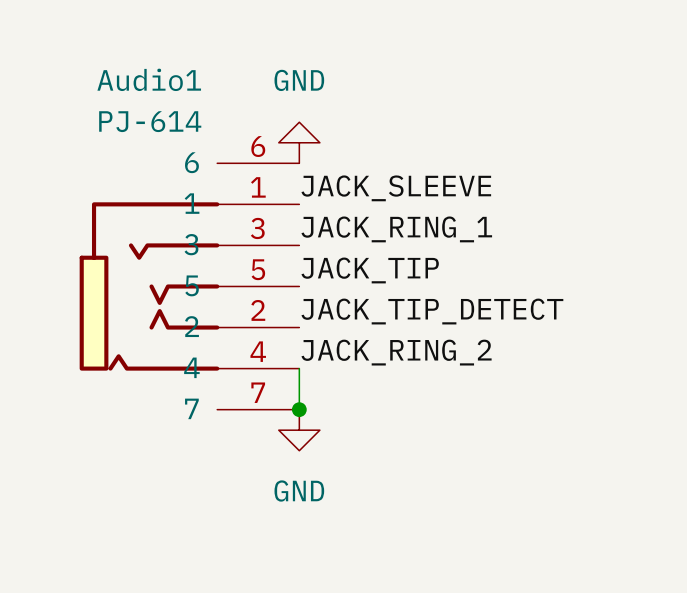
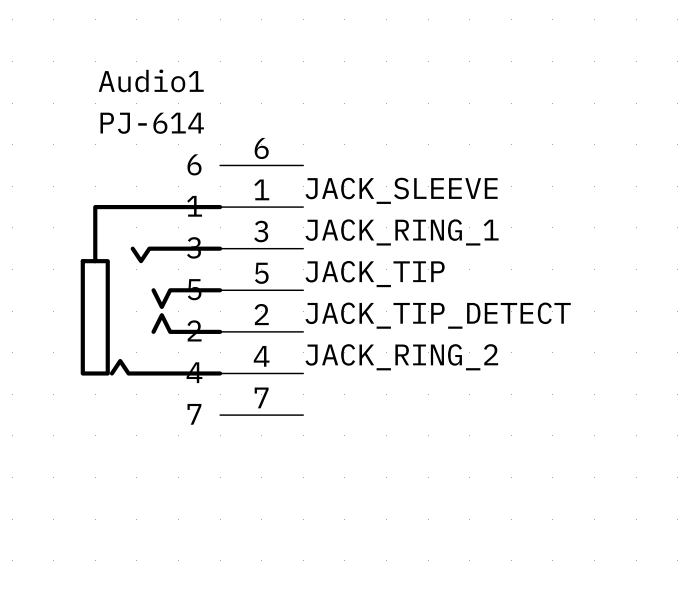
power symbol: GND (299, 142) -> none
wire: (299, 368) (299, 409) -> none
junction: (299, 409) -> none
power symbol: GND (299, 430) -> none

